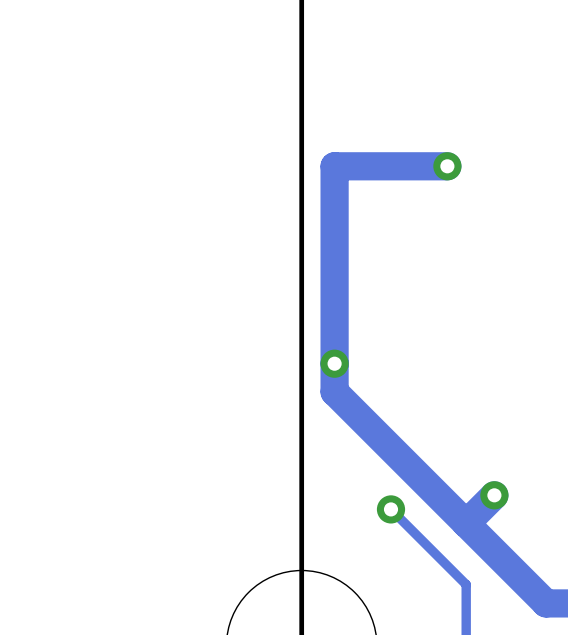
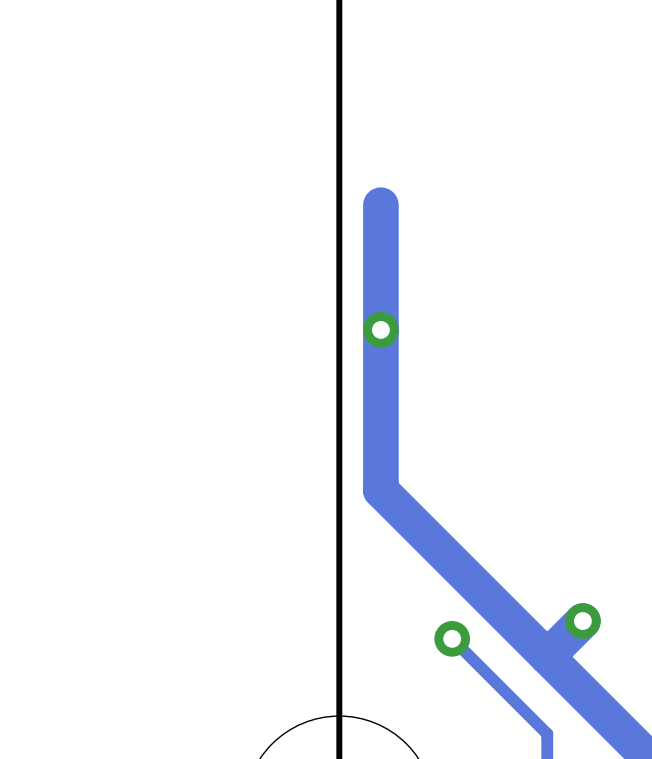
track: (447, 166) (334, 166) -> none
via: (447, 166) -> none
via: none -> (380, 329)
via: (334, 363) -> none

